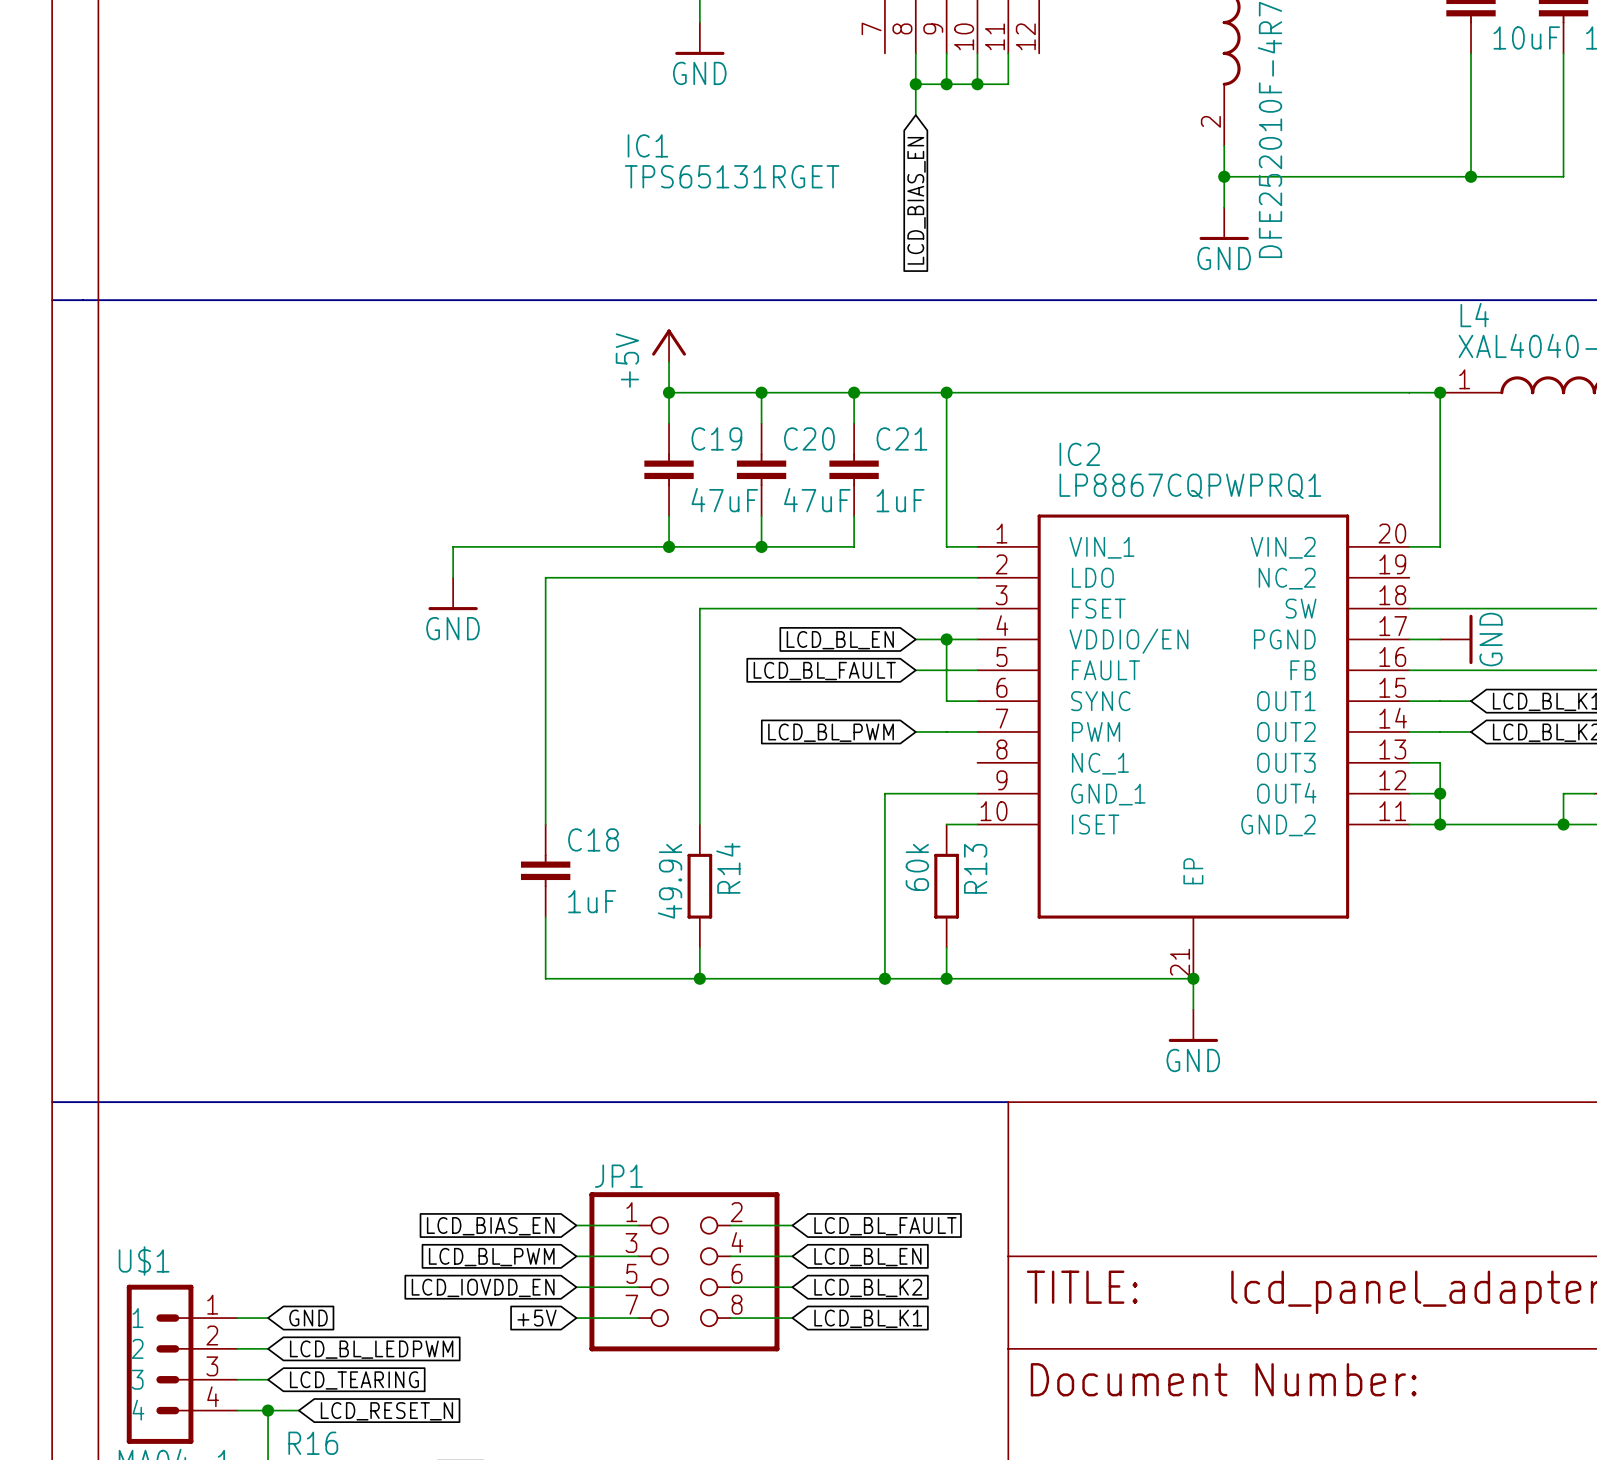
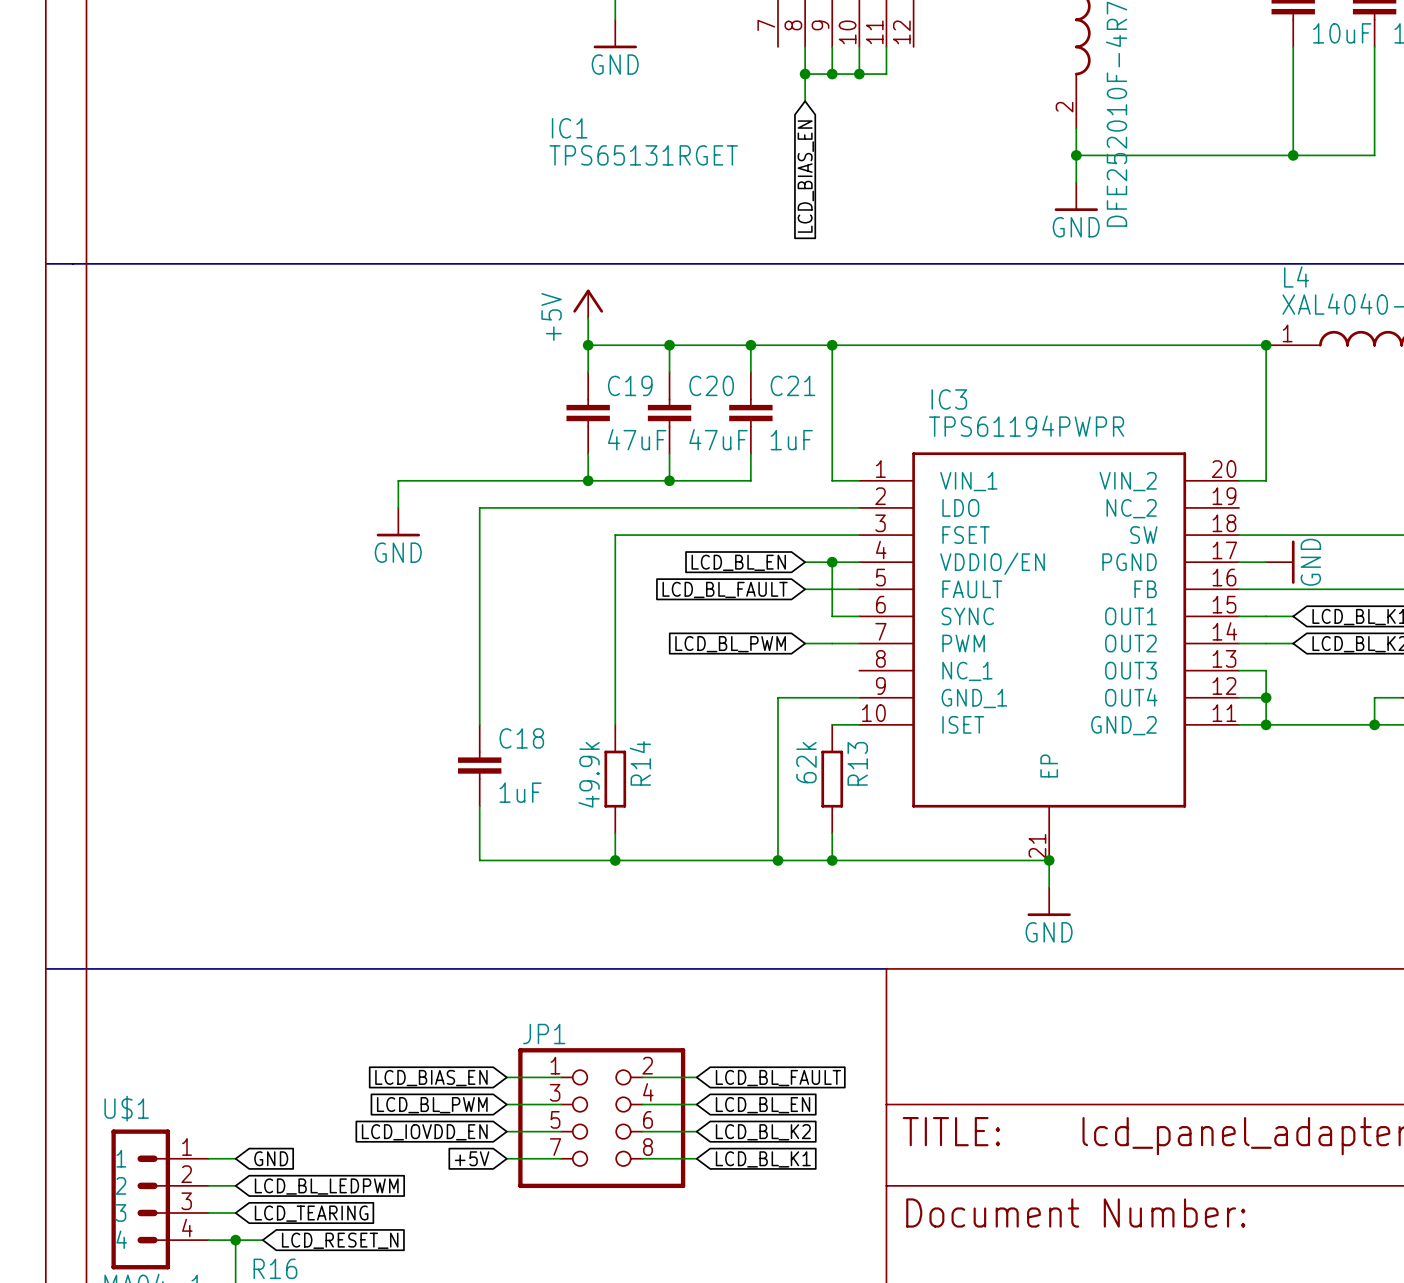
IC2 name: IC2 (1079, 454) -> IC3 (949, 399)
IC2 value: LP8867CQPWPRQ1 (1190, 486) -> TPS61194PWPR (1026, 426)
R13 value: 60k (917, 867) -> 62k (806, 762)

